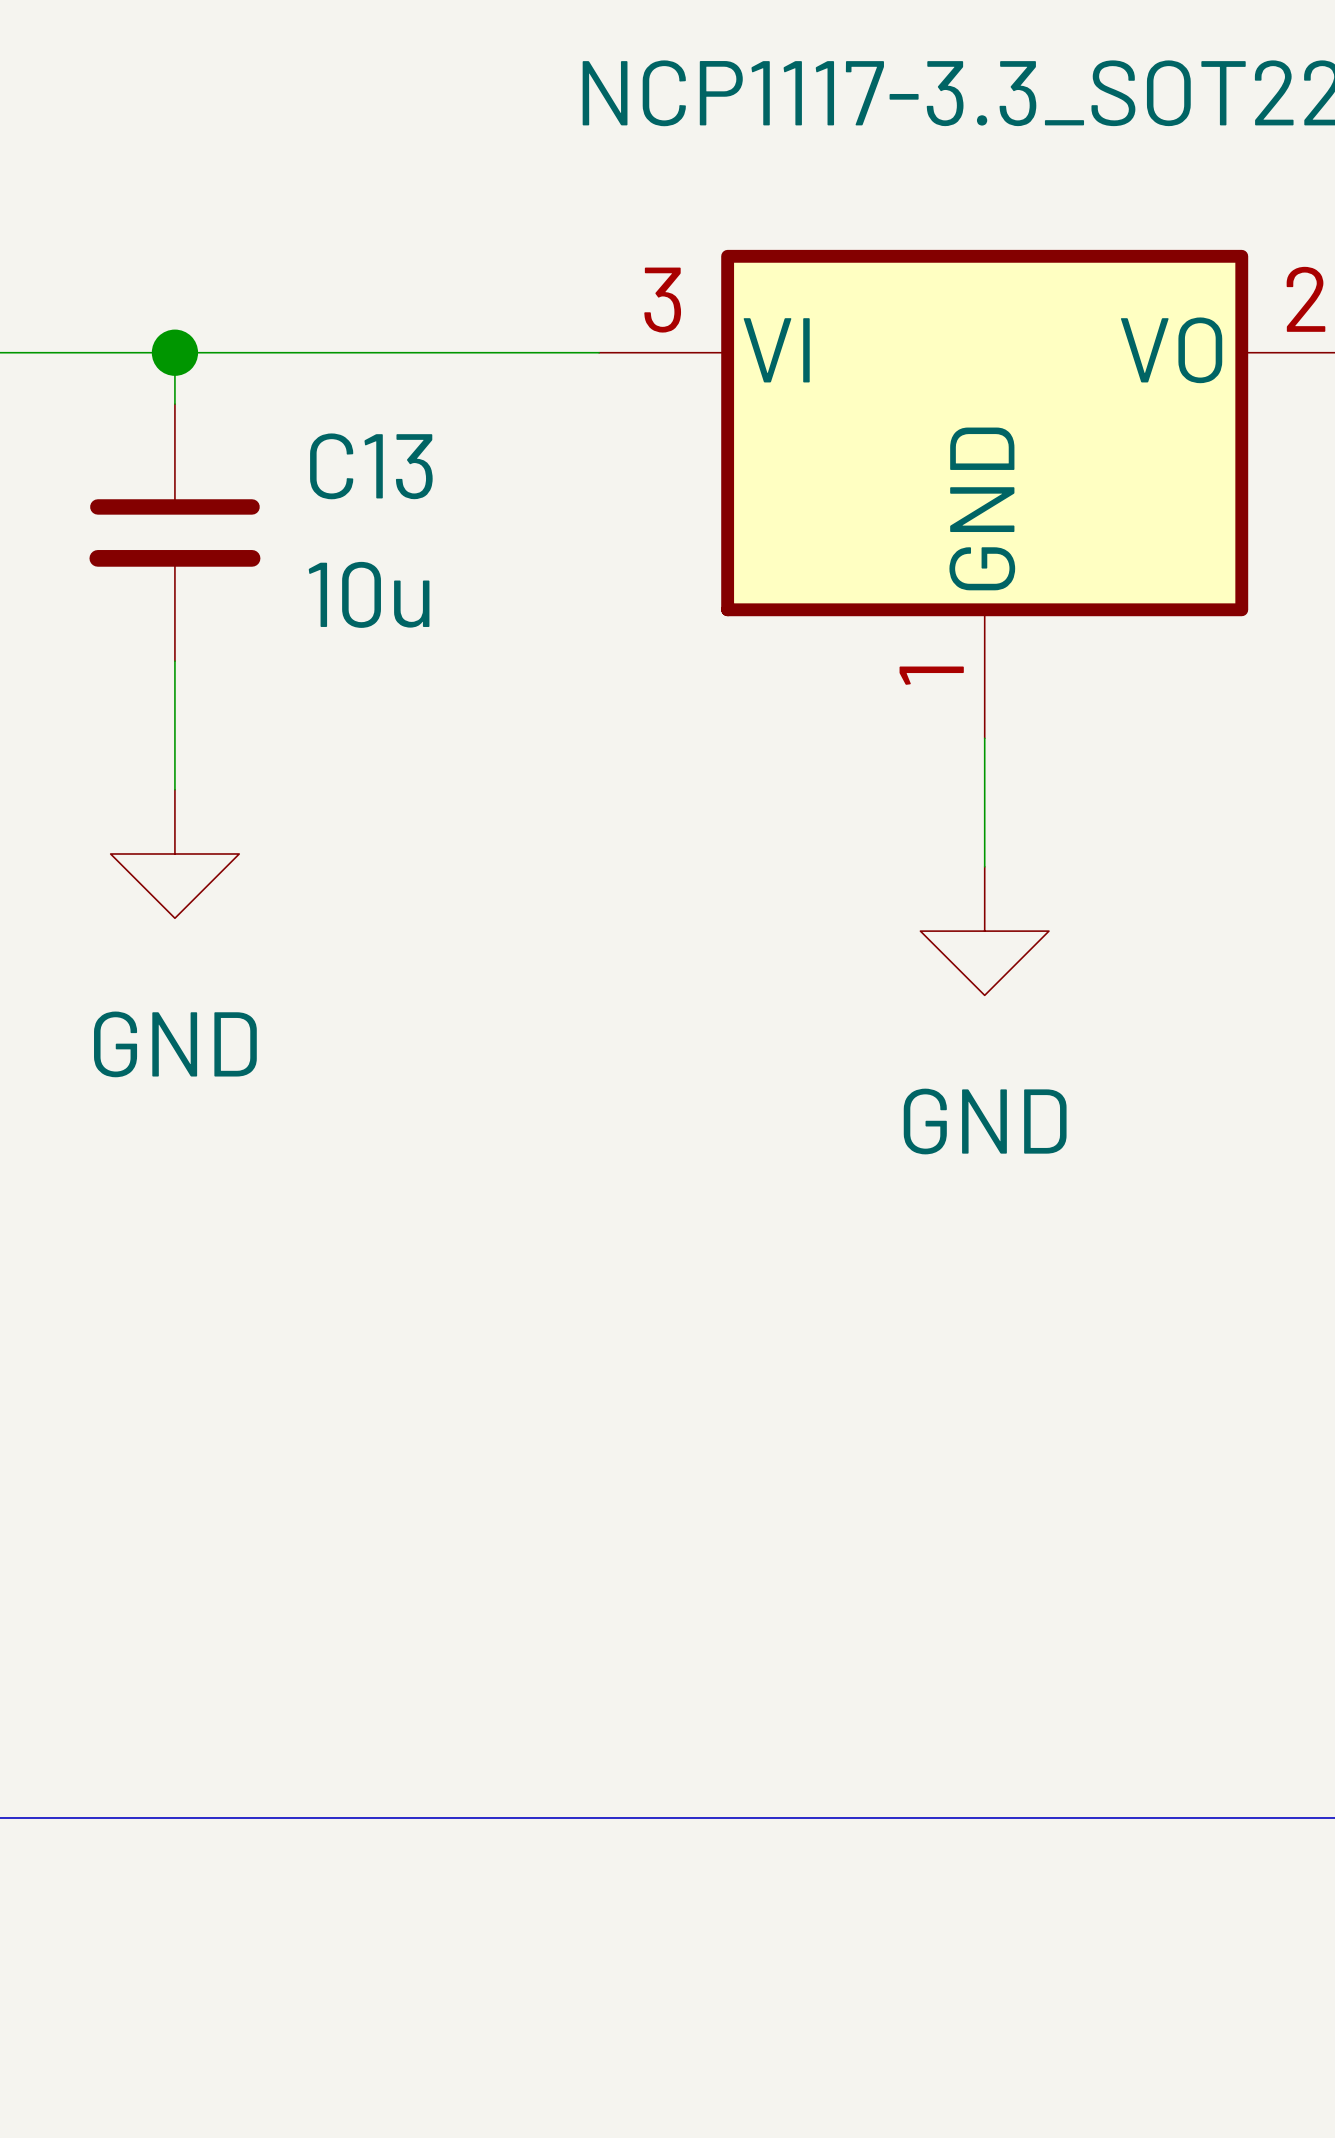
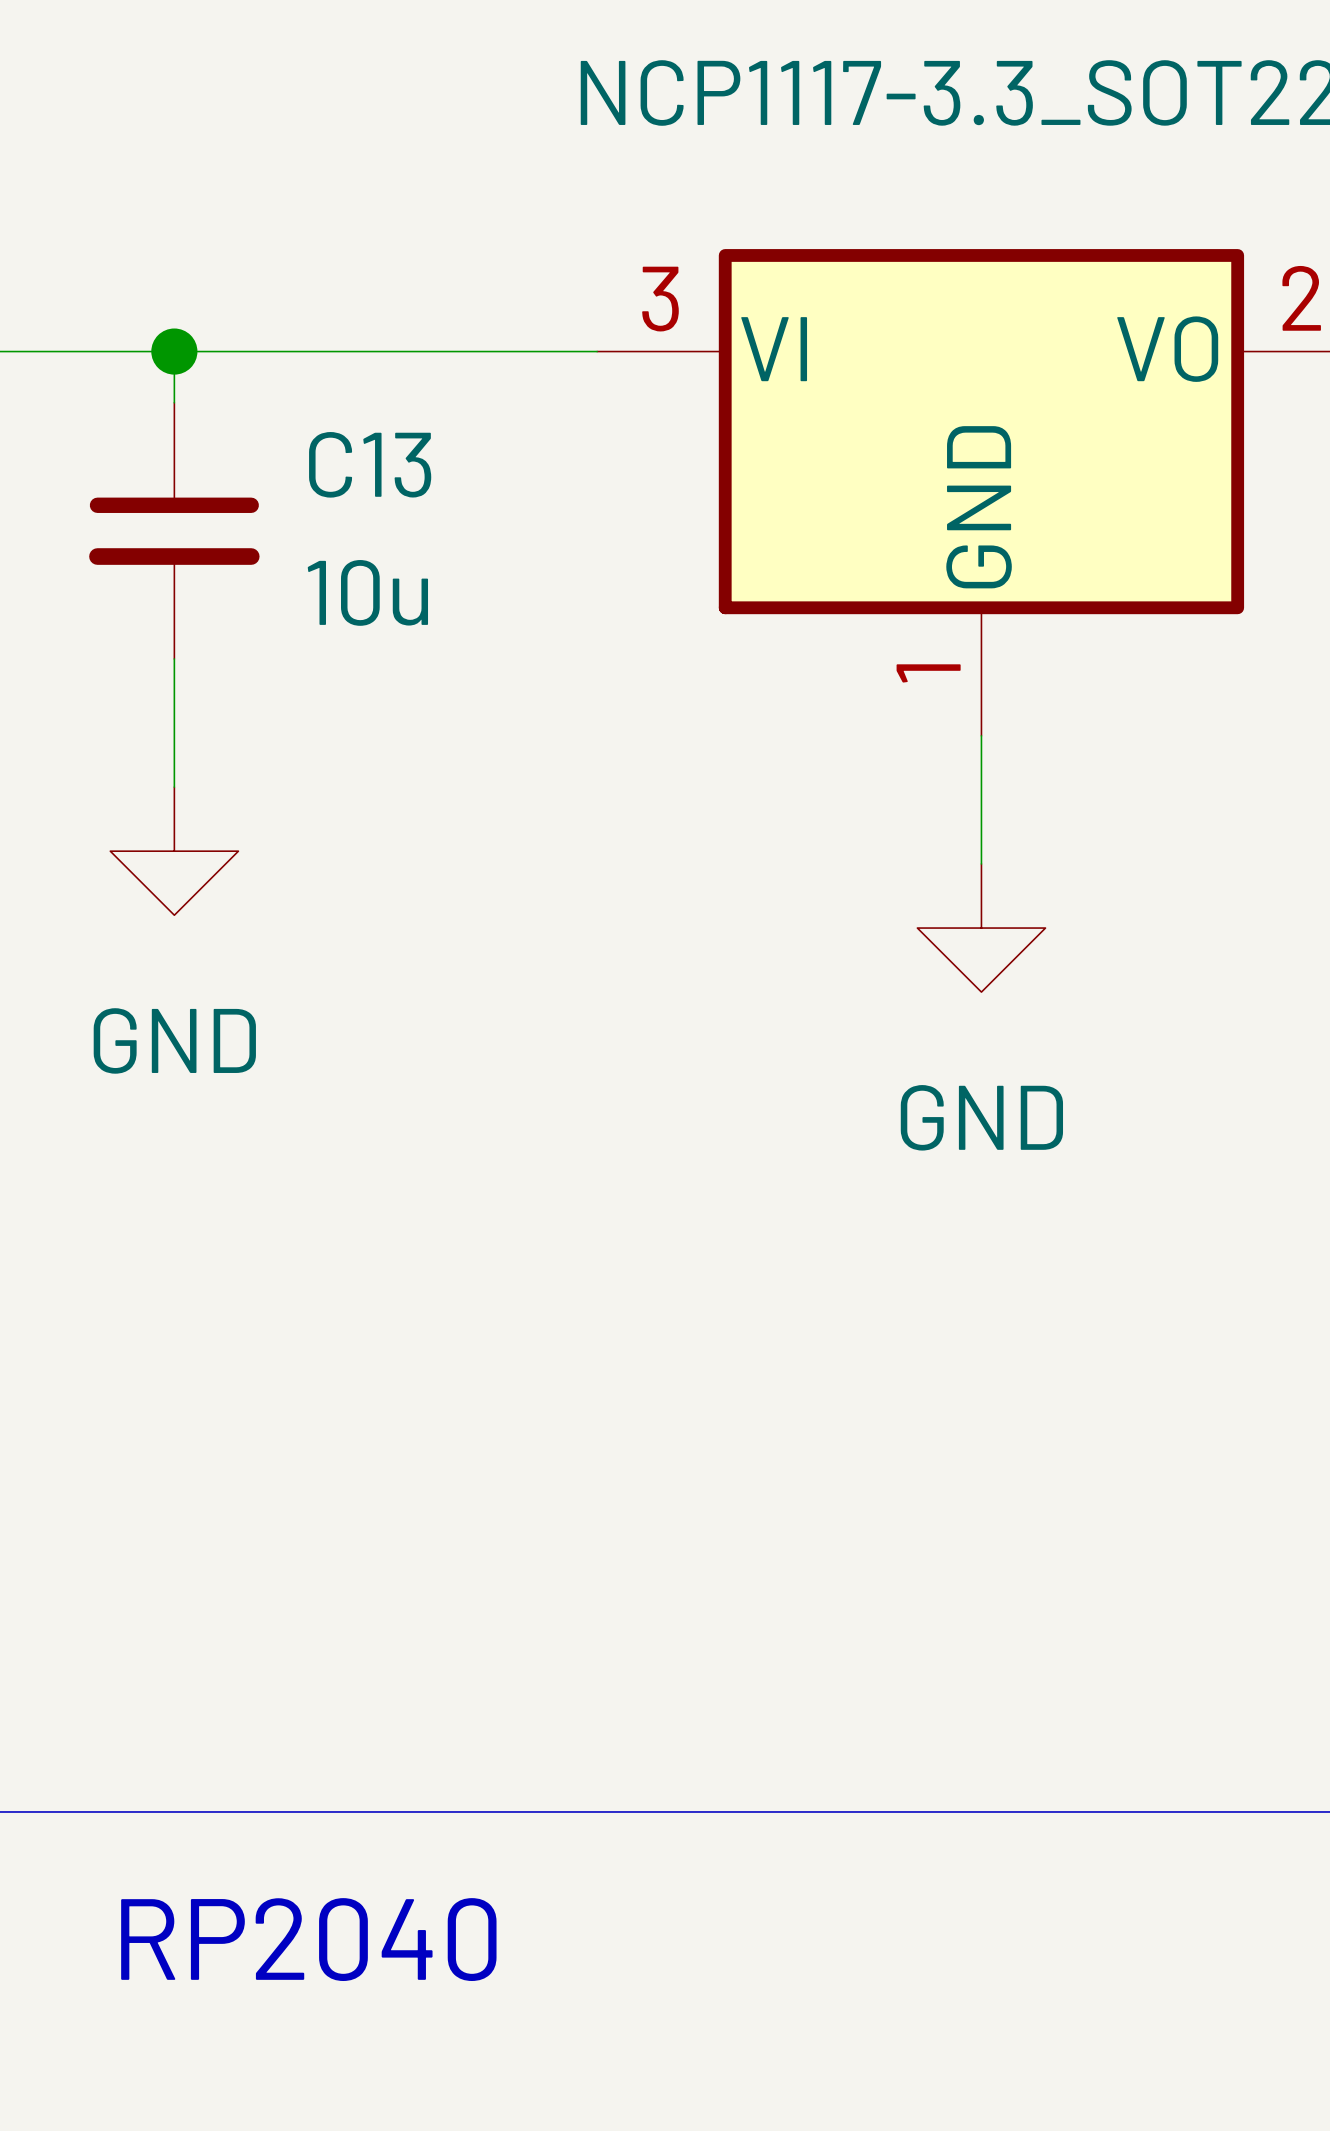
text: none -> RP2040 (308, 1939)

